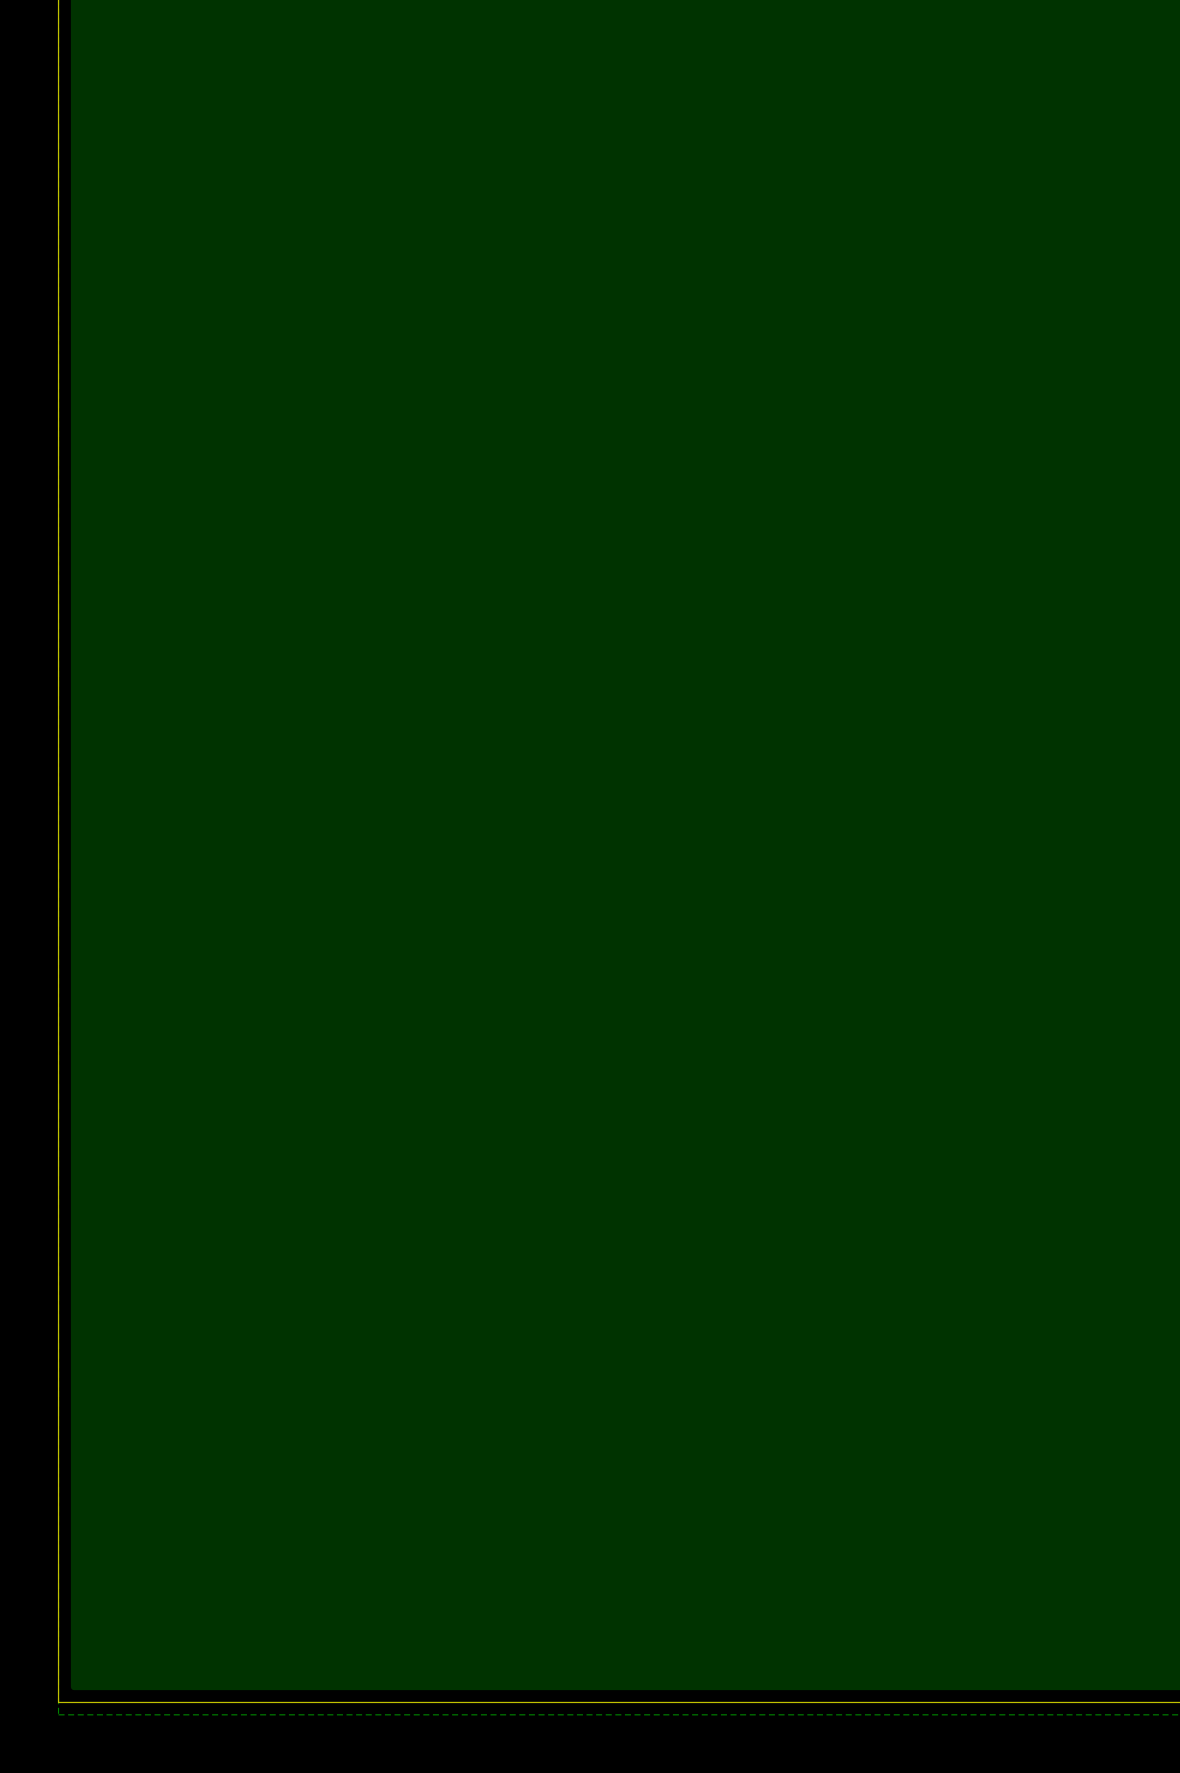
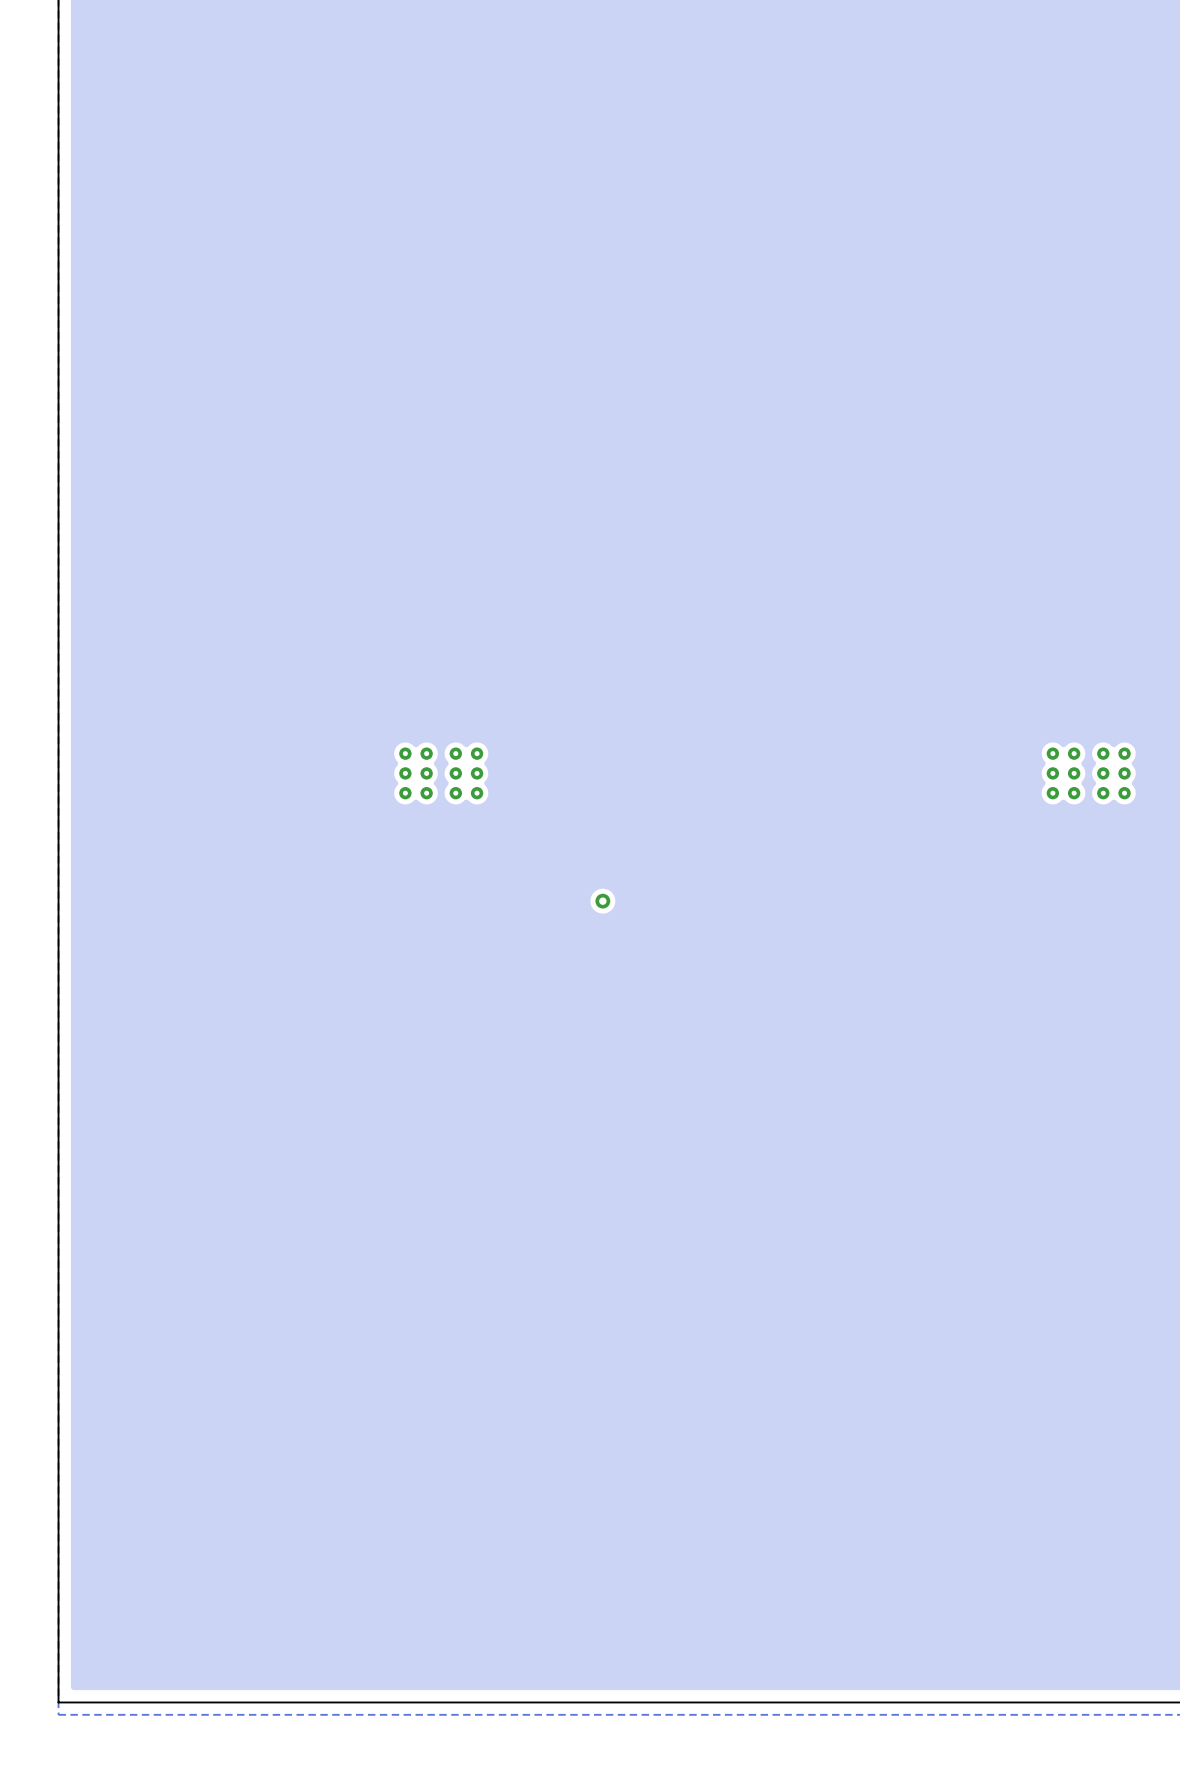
part: none -> (441, 773)
part: none -> (1088, 773)
via: none -> (602, 901)

